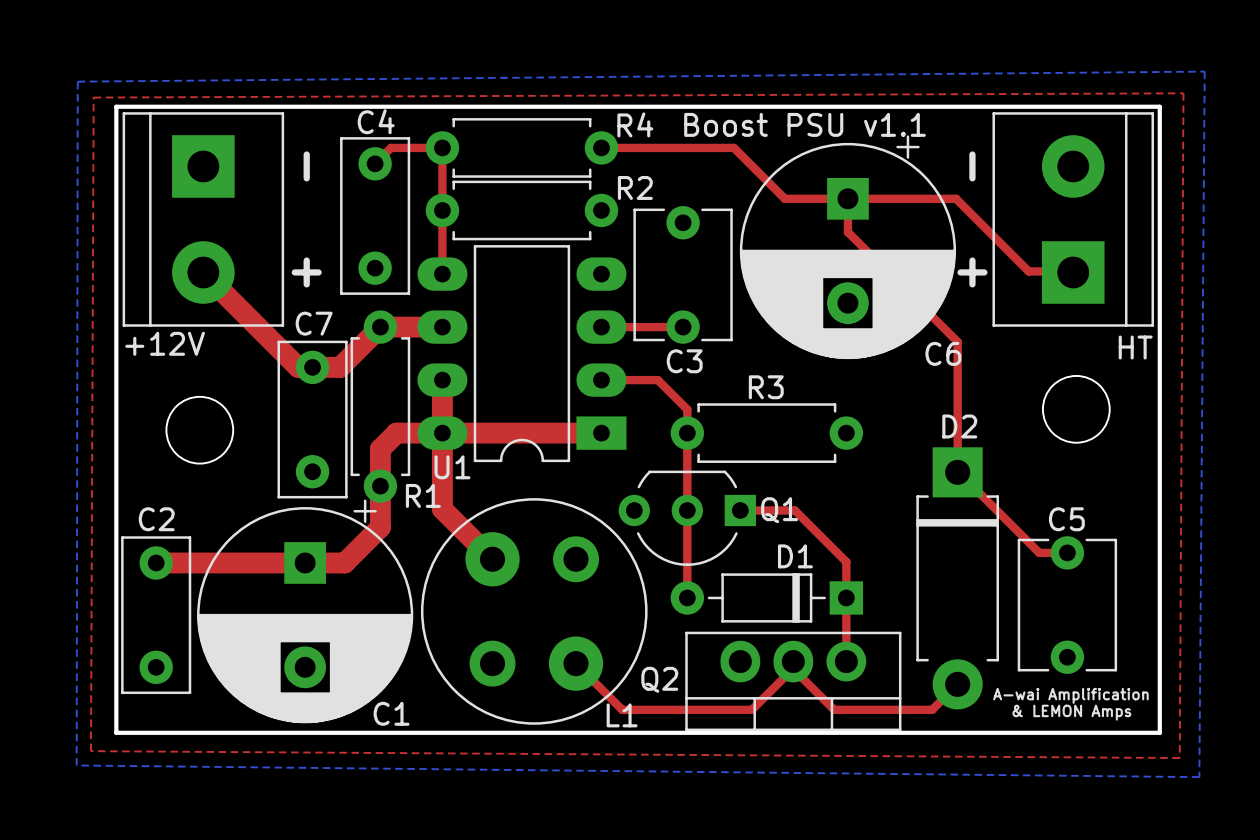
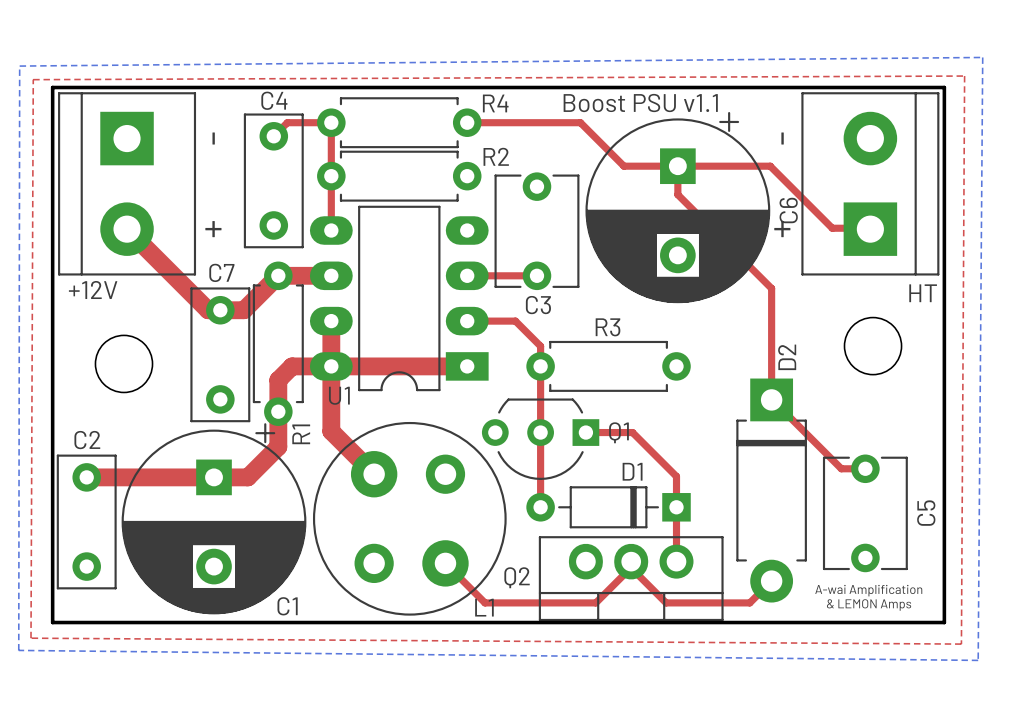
C6 name rotation: 0° (943, 353) -> 90° counterclockwise (788, 210)
C6 name position: C6 (943, 353) -> C6 (788, 210)
D2 name rotation: 0° (959, 426) -> 90° counterclockwise (787, 357)
R1 name rotation: 0° (423, 495) -> 90° counterclockwise (301, 434)
C5 name rotation: 0° (1066, 519) -> 90° counterclockwise (926, 513)
C5 name position: C5 (1066, 519) -> C5 (926, 513)

